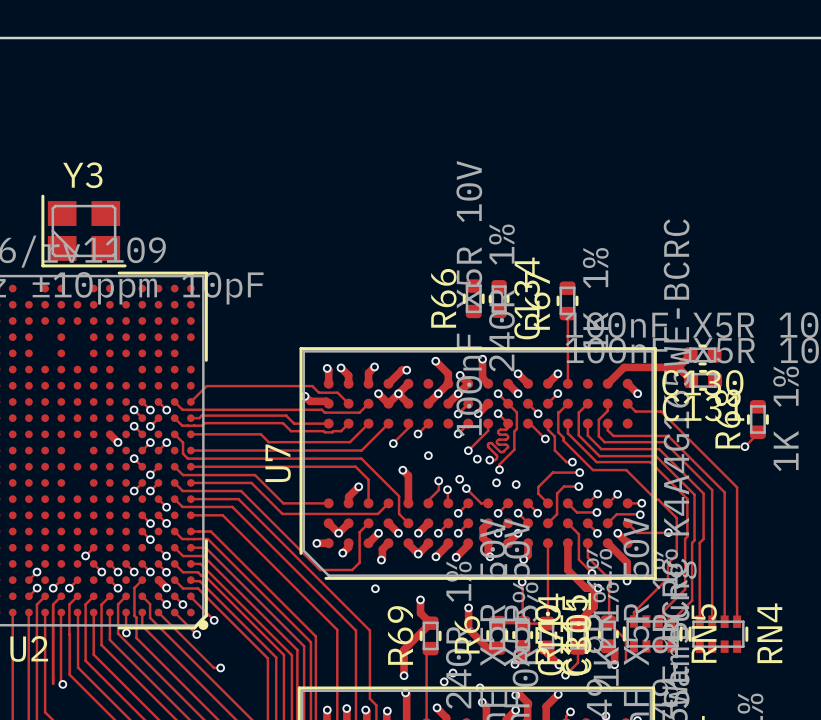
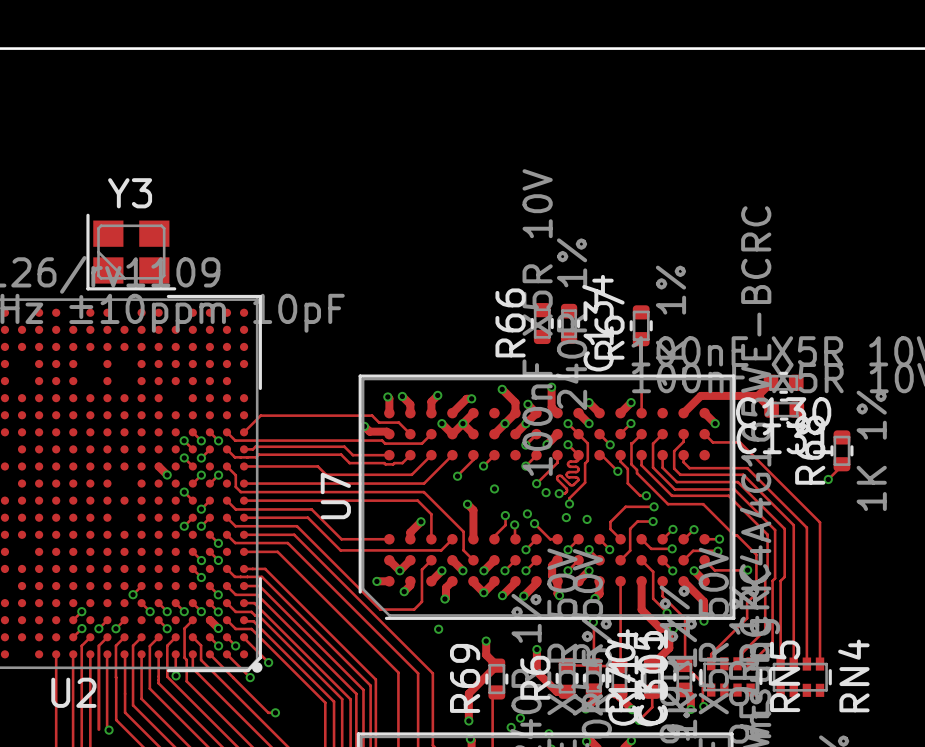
via: none -> (703, 706)

